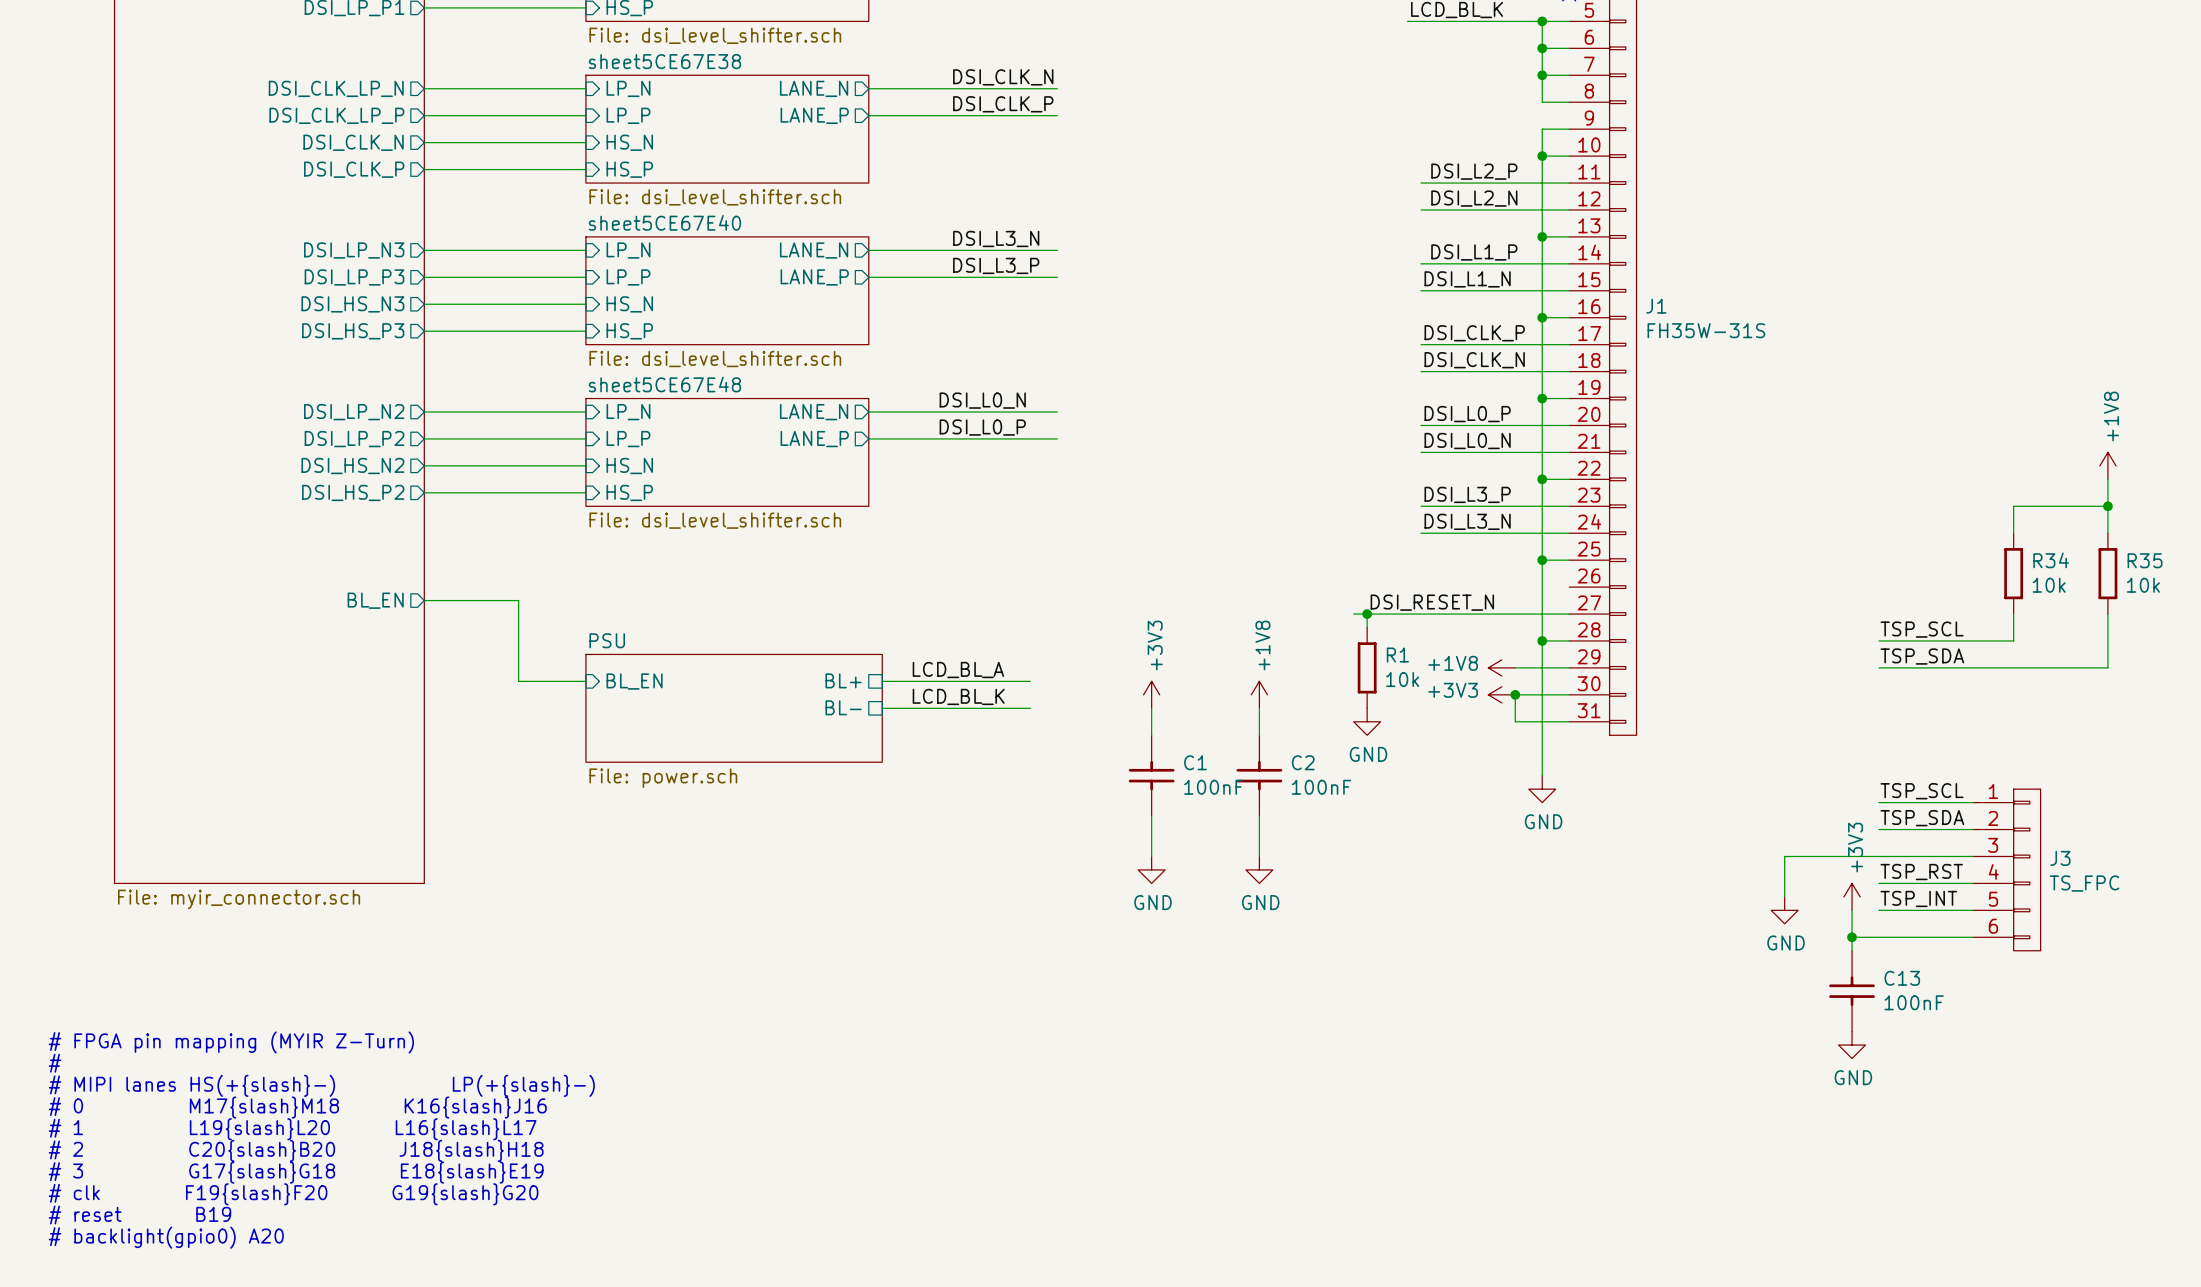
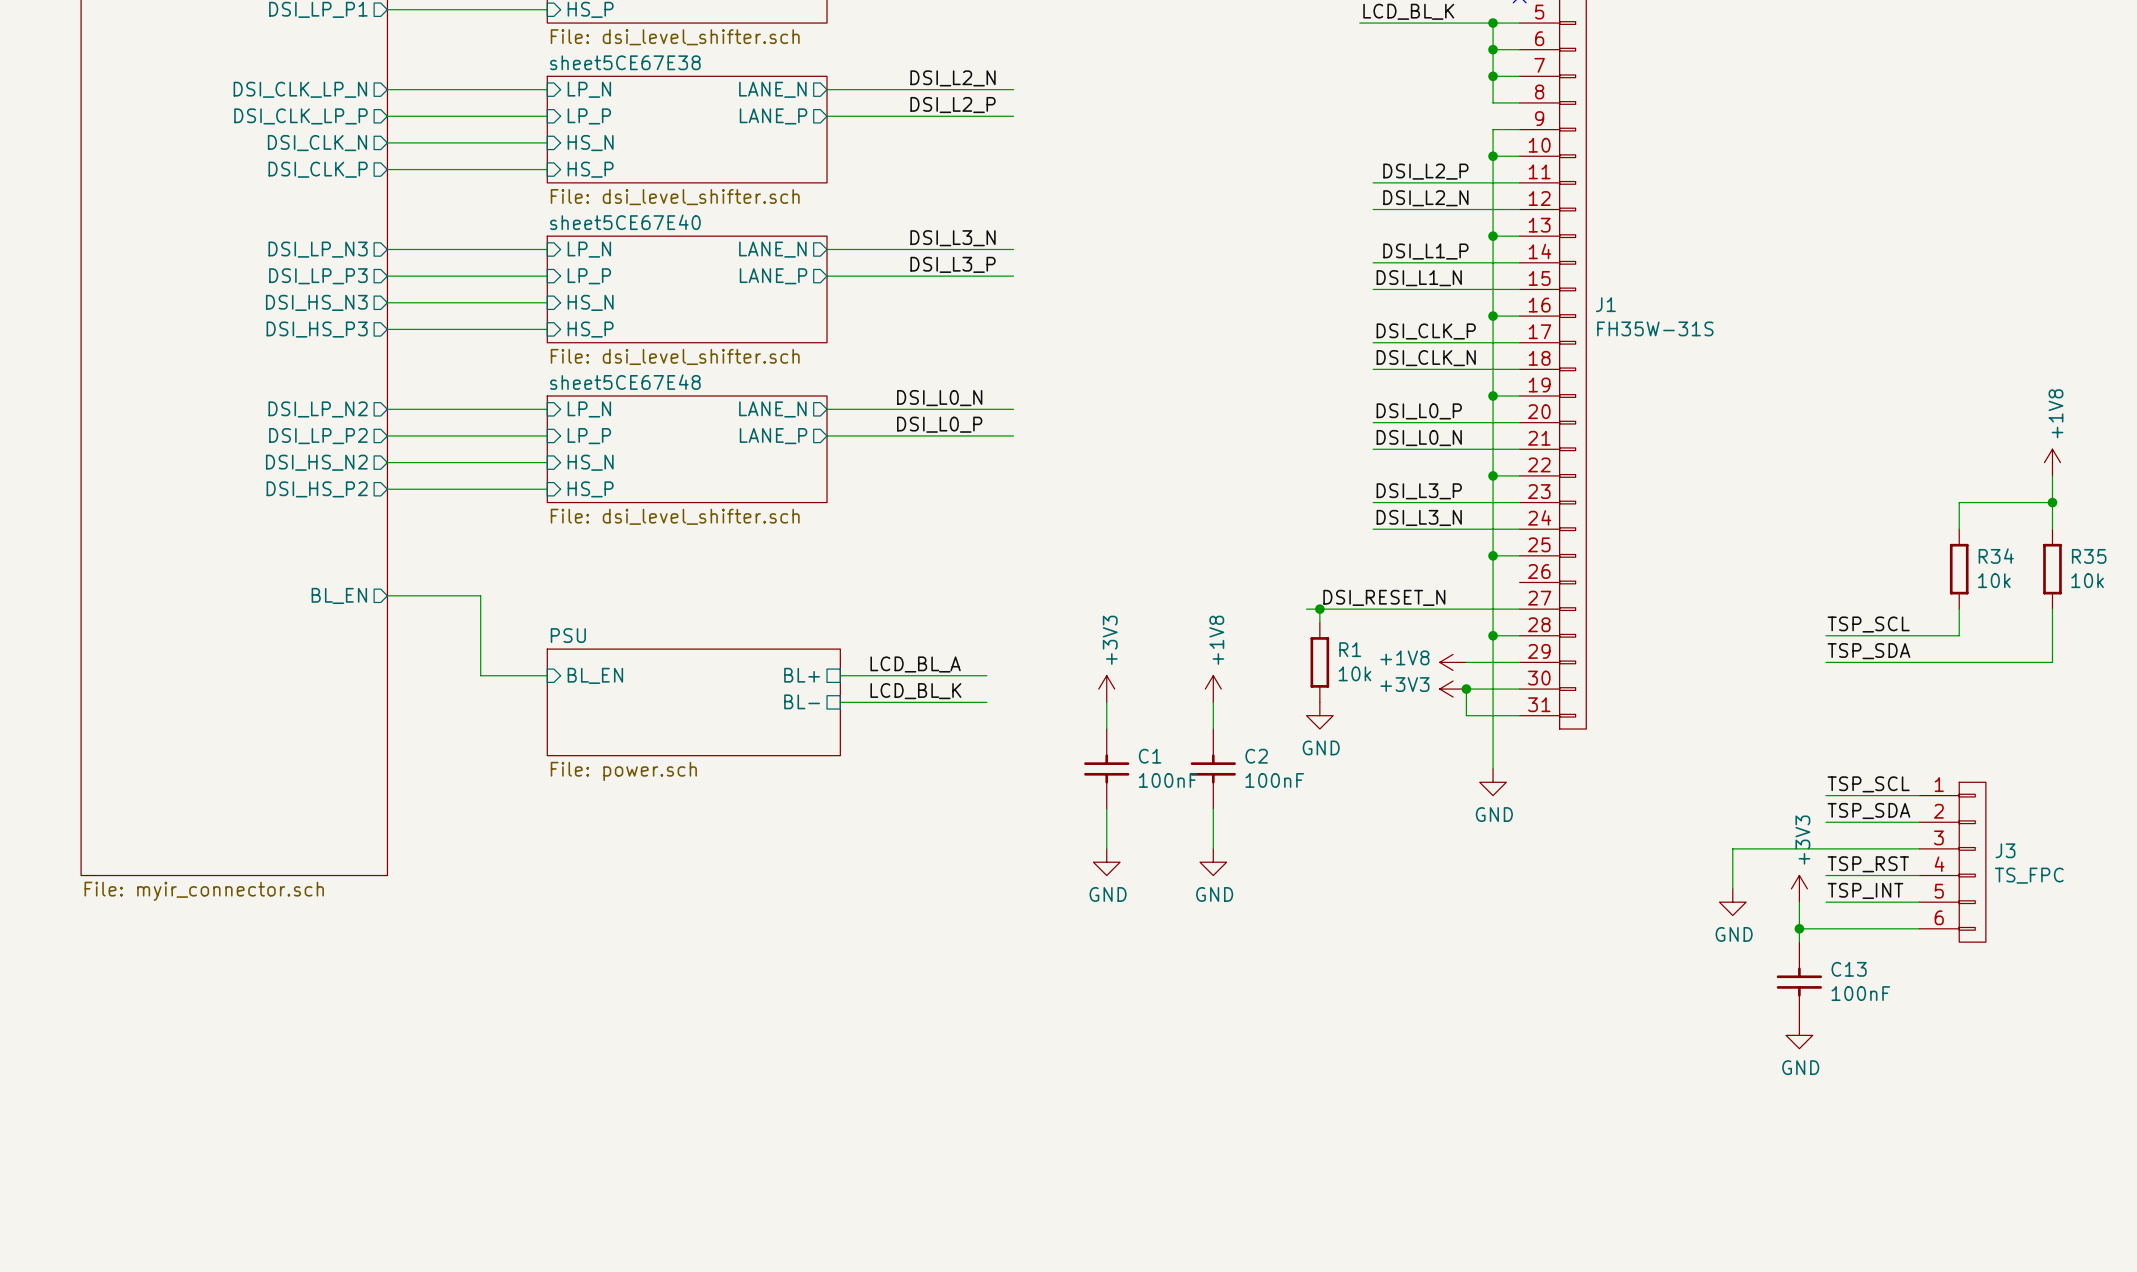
label: DSI_CLK_N (1003, 77) -> DSI_L2_N (953, 78)
label: DSI_CLK_P (1003, 104) -> DSI_L2_P (953, 105)
text: # FPGA pin mapping (MYIR Z-Turn) (231, 1042) -> none
text: # (54, 1063) -> none
text: # MIPI lanes HS(+{slash}-) LP(+{slash}-) (321, 1085) -> none
text: # 0 M17{slash}M18 K16{slash}J16 (297, 1107) -> none
text: # 1 L19{slash}L20 L16{slash}L17 (292, 1129) -> none
text: # 2 C20{slash}B20 J18{slash}H18 (296, 1150) -> none
text: # 3 G17{slash}G18 E18{slash}E19 (296, 1172) -> none
text: # clk F19{slash}F20 G19{slash}G20 (293, 1194) -> none
text: # reset B19 (139, 1215) -> none
text: # backlight(gpio0) A20 (166, 1237) -> none

